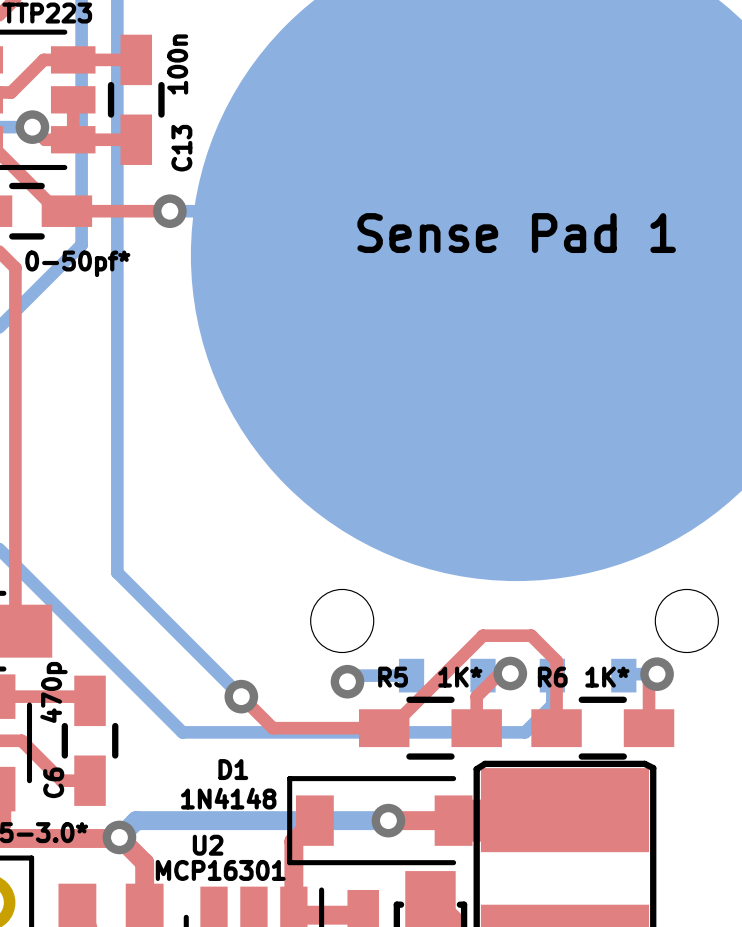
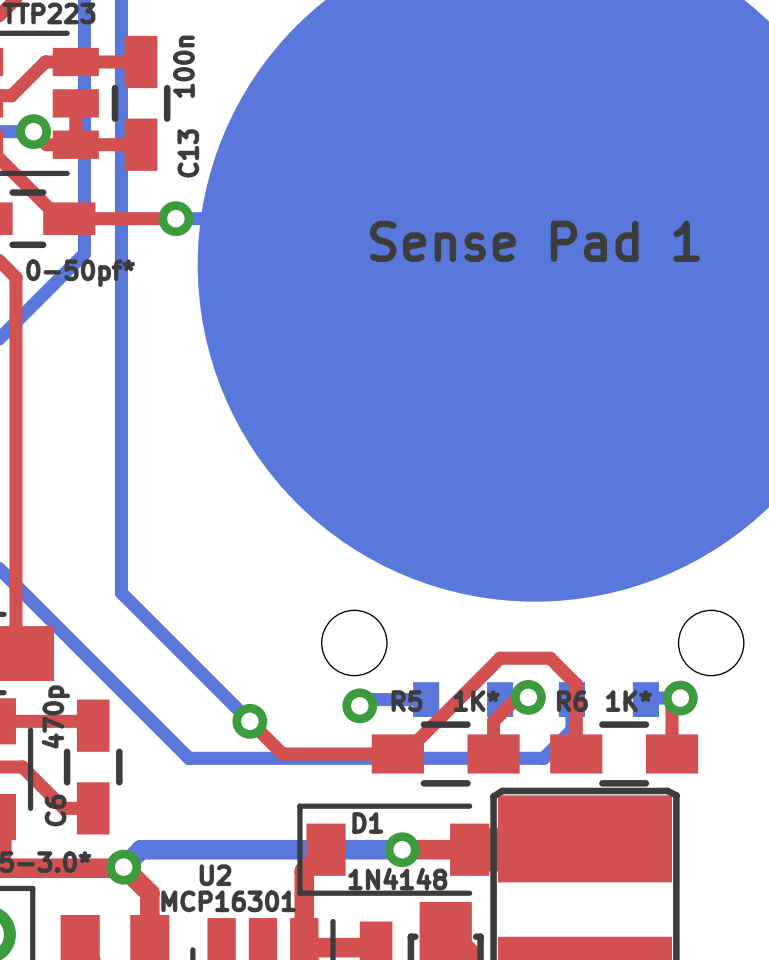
D1 name position: D1 (233, 769) -> D1 (367, 822)
D1 value position: 1N4148 (228, 798) -> 1N4148 (397, 879)

